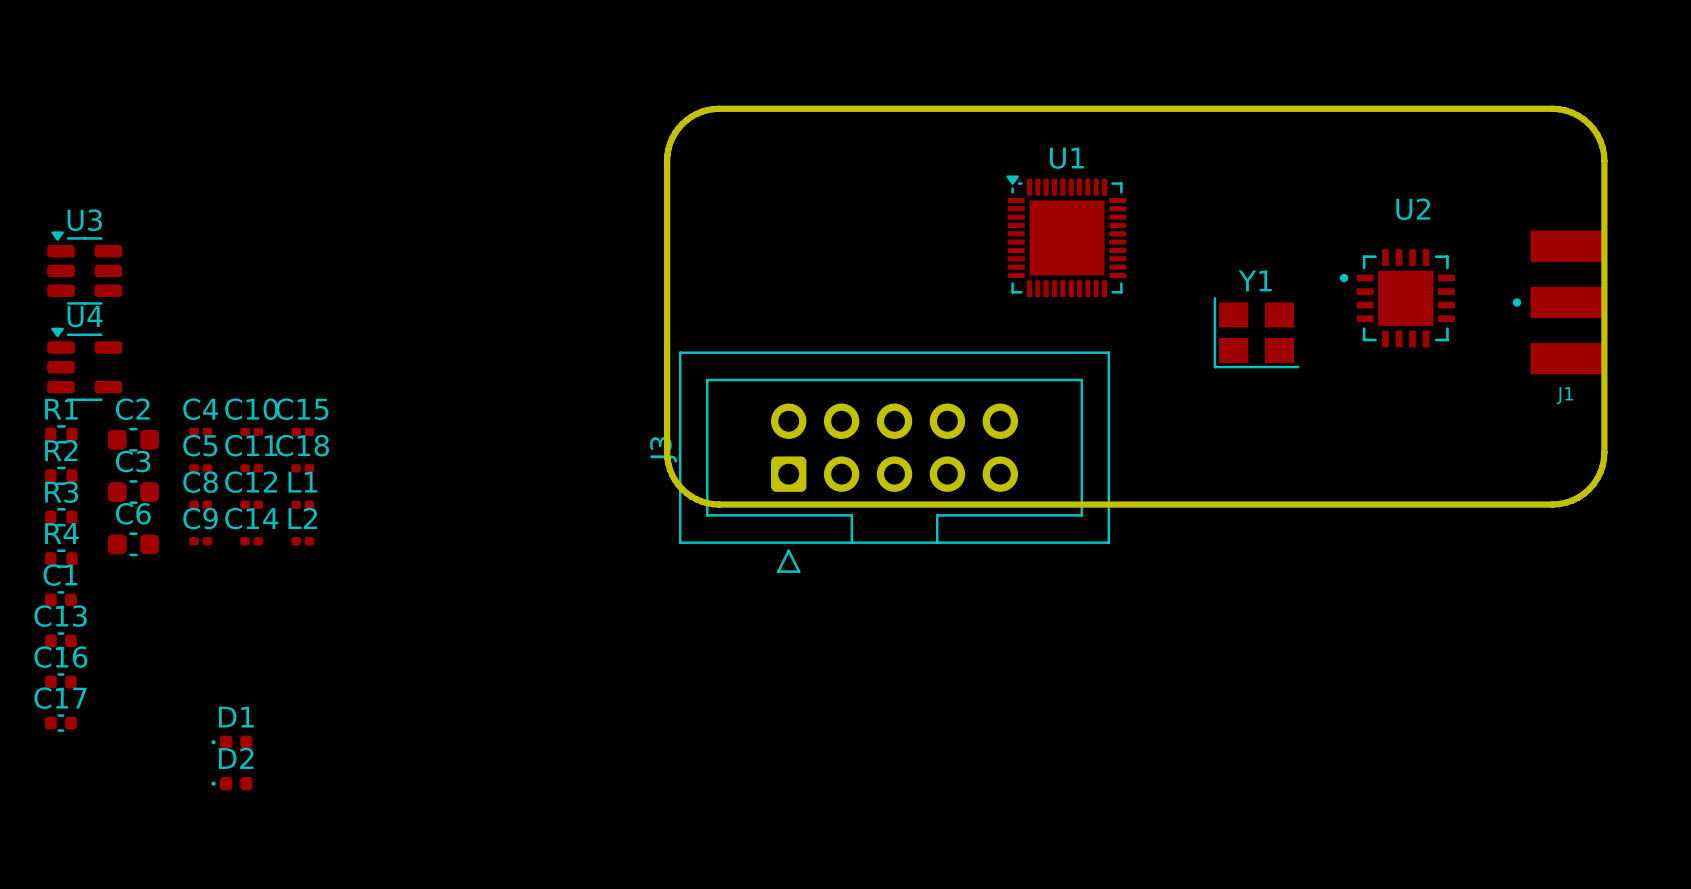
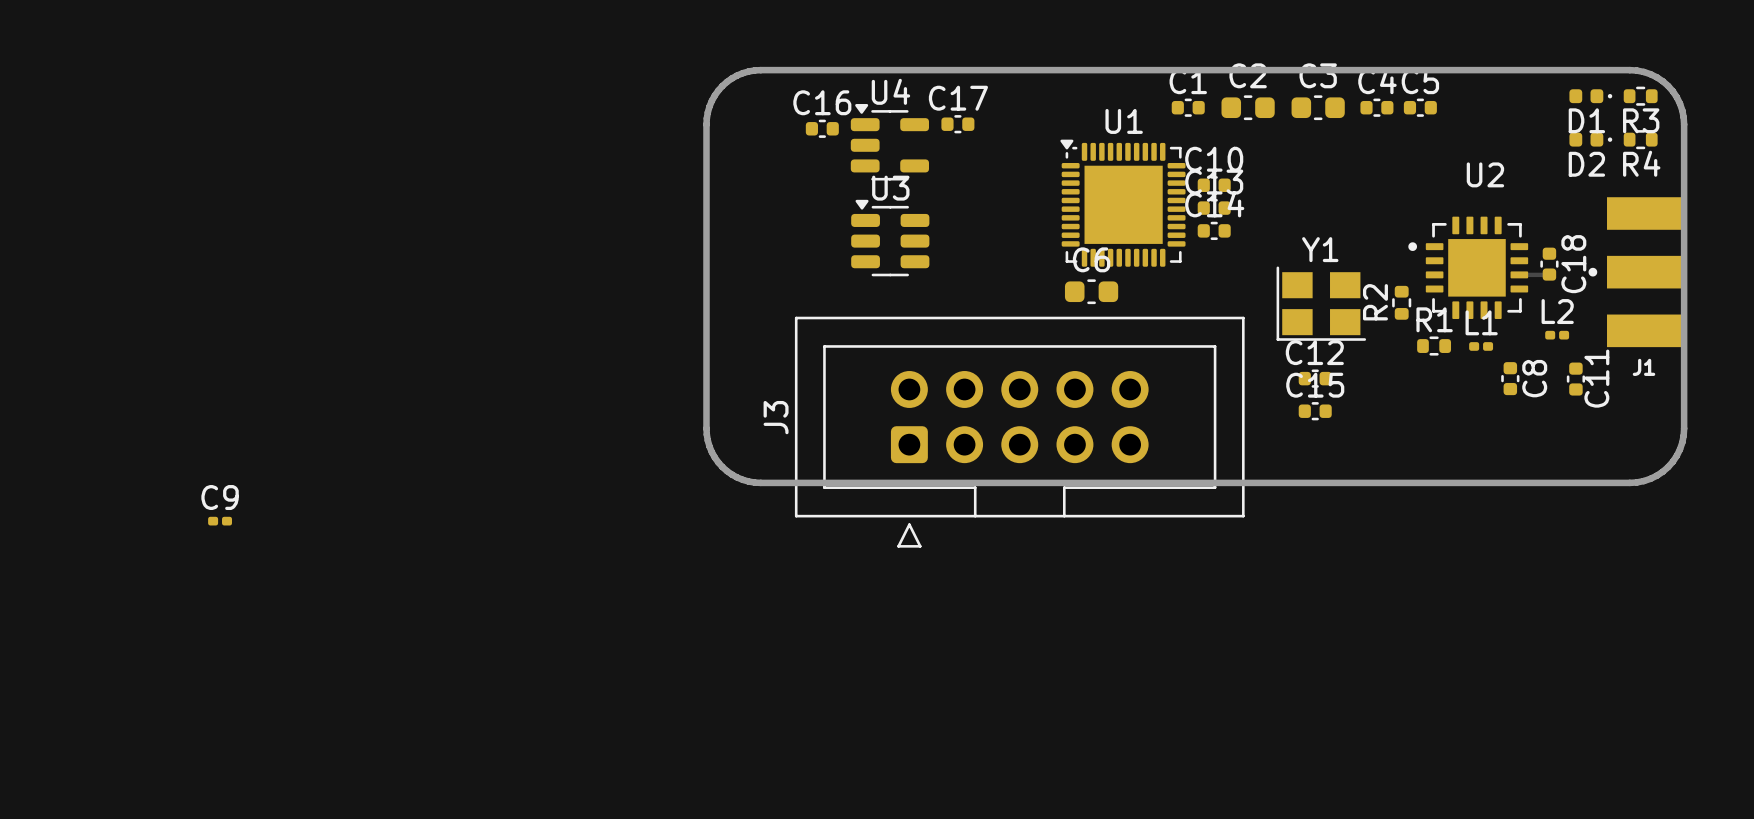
U3 position: (84, 268) -> (890, 238)
track: none -> (1549, 274) (1519, 274)
U4 position: (84, 364) -> (889, 142)
C4 footprint: [189, 427, 213, 437] -> [1360, 98, 1394, 117]
C10 footprint: [240, 427, 264, 437] -> [1197, 176, 1231, 195]
C15 footprint: [291, 427, 315, 437] -> [1298, 402, 1332, 421]
R1 position: (61, 434) -> (1434, 346)
C2 position: (133, 439) -> (1248, 107)
J3 position: (894, 462) -> (1019, 432)
C5 footprint: [189, 464, 213, 473] -> [1403, 98, 1437, 117]
C11 footprint: [240, 464, 264, 473] -> [1566, 362, 1586, 396]
C18 footprint: [291, 464, 315, 473] -> [1540, 247, 1559, 281]
R2 rotation: 0° (61, 475) -> 90° clockwise (1401, 302)
R2 position: (61, 475) -> (1401, 302)
R3 name position: R3 (61, 492) -> R3 (1641, 120)
C3 position: (133, 492) -> (1318, 107)
C8 footprint: [189, 500, 213, 509] -> [1501, 362, 1520, 396]
C12 footprint: [240, 500, 264, 509] -> [1298, 369, 1332, 388]
L1 position: (302, 504) -> (1481, 346)
R3 position: (61, 517) -> (1640, 96)
R4 name position: R4 (61, 533) -> R4 (1641, 163)
C14 footprint: [240, 537, 264, 546] -> [1197, 221, 1231, 241]
L2 position: (302, 541) -> (1557, 335)
C6 position: (133, 544) -> (1091, 291)
R4 position: (61, 558) -> (1640, 139)
C1 position: (60, 599) -> (1188, 107)
C13 position: (60, 640) -> (1214, 208)
C16 position: (60, 682) -> (822, 128)
C17 position: (60, 723) -> (957, 124)
D1 rotation: 0° (231, 742) -> 180° (1590, 96)
D1 position: (231, 742) -> (1590, 96)
D2 rotation: 0° (231, 783) -> 180° (1590, 139)
D2 position: (231, 783) -> (1590, 139)

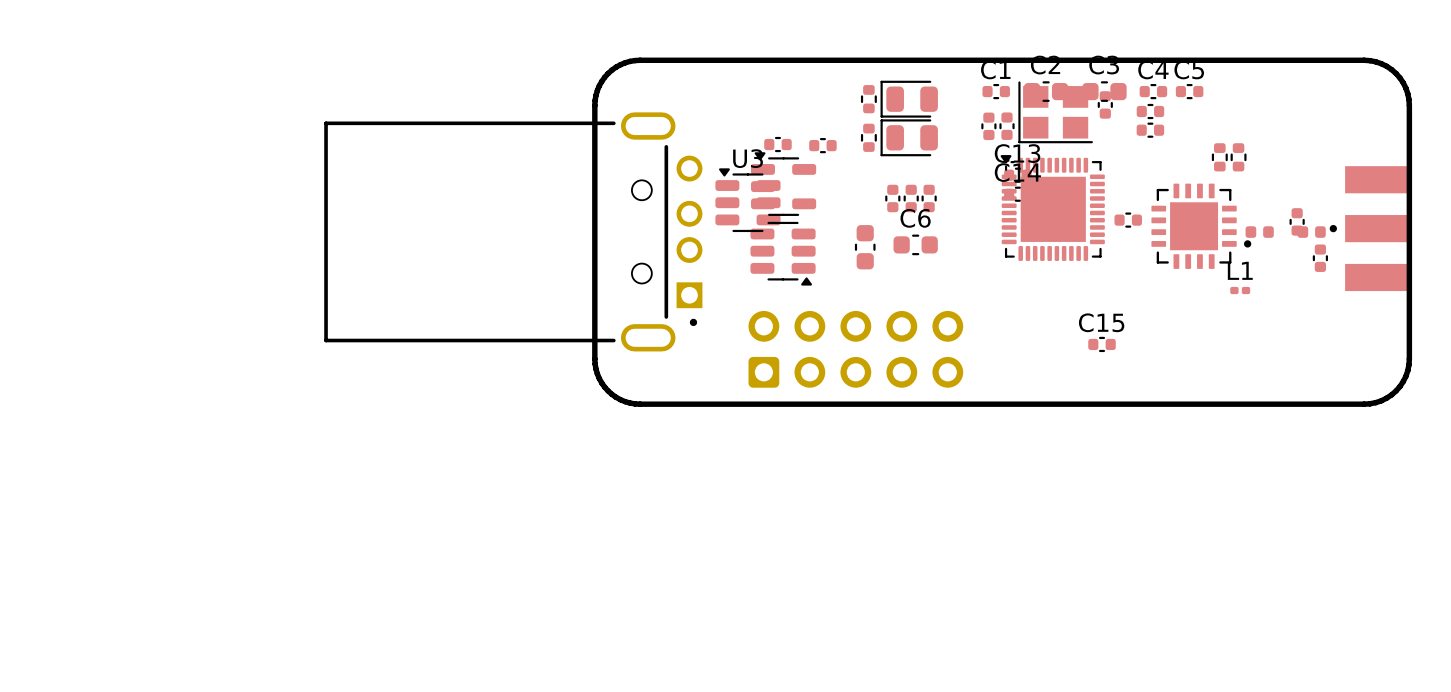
D1: (1590, 96) -> none
R3: (1640, 96) -> none
part: none -> (868, 99)
part: none -> (909, 99)
part: none -> (1105, 104)
C17: (957, 124) -> none
C16: (822, 128) -> none
part: none -> (1150, 111)
part: none -> (1055, 112)
D2: (1590, 139) -> none
R4: (1640, 139) -> none
U4: (889, 142) -> none
part: none -> (988, 126)
part: none -> (1007, 126)
part: none -> (1150, 130)
part: none -> (868, 137)
part: none -> (909, 137)
part: none -> (777, 144)
part: none -> (822, 145)
C10: (1214, 185) -> none
part: none -> (1219, 157)
part: none -> (1238, 157)
U1: (1122, 203) -> none
part: none -> (783, 184)
part: none -> (892, 198)
part: none -> (911, 198)
part: none -> (929, 198)
part: none -> (1052, 208)
part: none -> (1128, 220)
C18 name: C18 (1573, 264) -> none
U2: (1468, 267) -> none
part: none -> (1201, 226)
track: (1549, 274) (1519, 274) -> none
part: none -> (513, 231)
part: none -> (1259, 232)
part: none -> (1311, 232)
part: none -> (865, 247)
part: none -> (783, 253)
R2: (1401, 302) -> none
Y1: (1321, 303) -> none
part: none -> (1320, 258)
L2: (1557, 335) -> none
R1: (1434, 346) -> none
J1 name: J1 (1644, 367) -> none
C12: (1315, 378) -> none
C8: (1510, 378) -> none
C11: (1575, 379) -> none
J3: (1019, 432) -> none
C9: (220, 521) -> none

